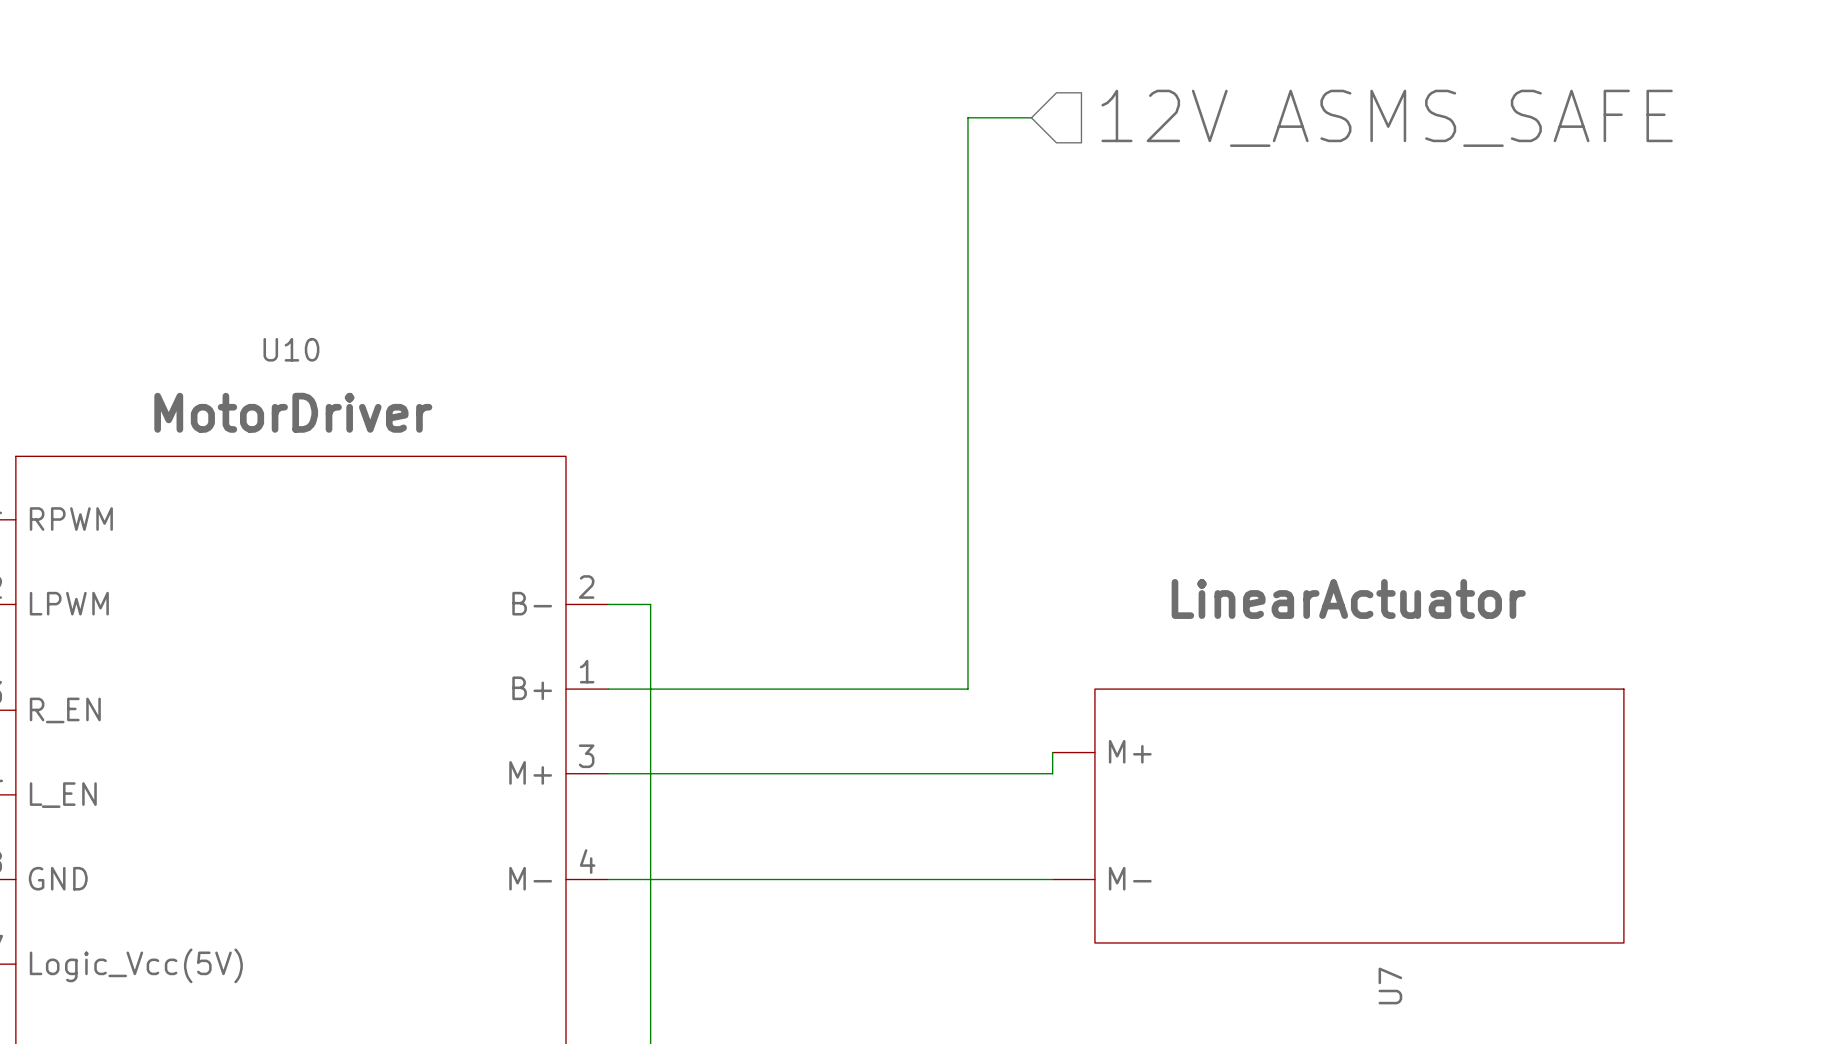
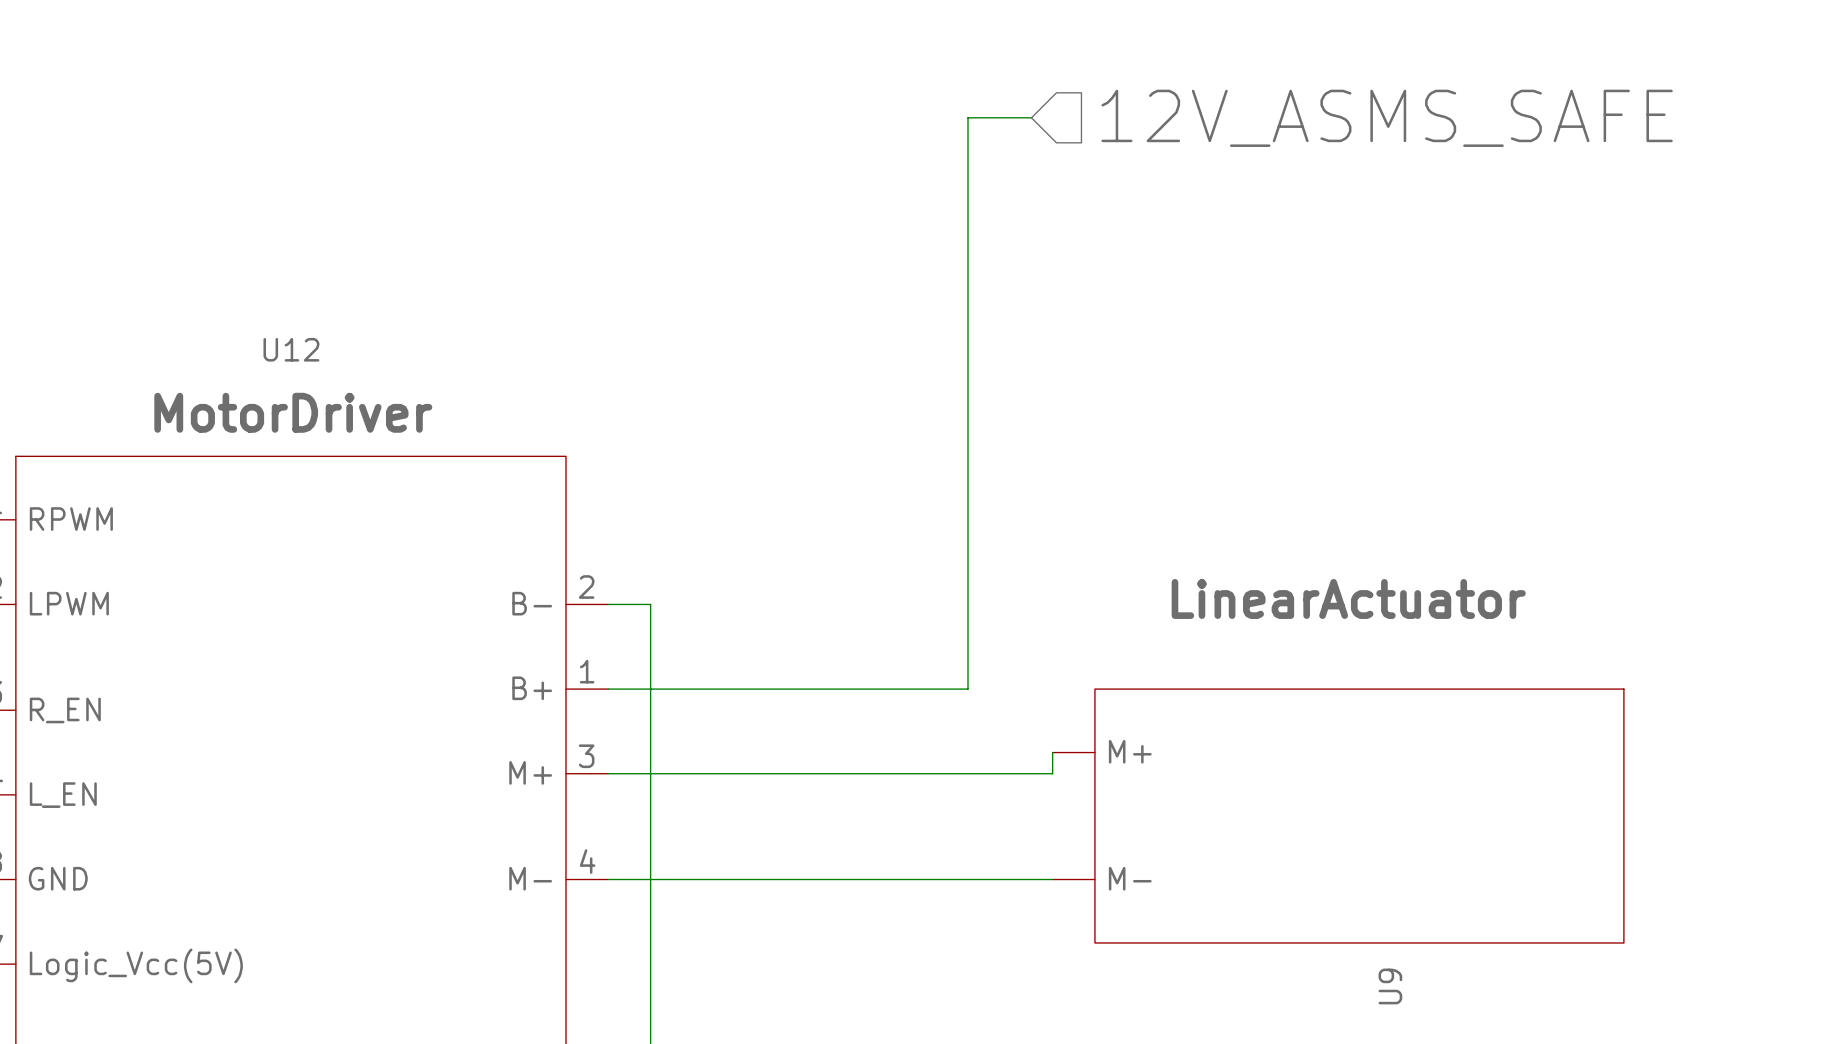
U10 name: U10 (291, 349) -> U12 (291, 349)
U7 name: U7 (1390, 985) -> U9 (1390, 986)

